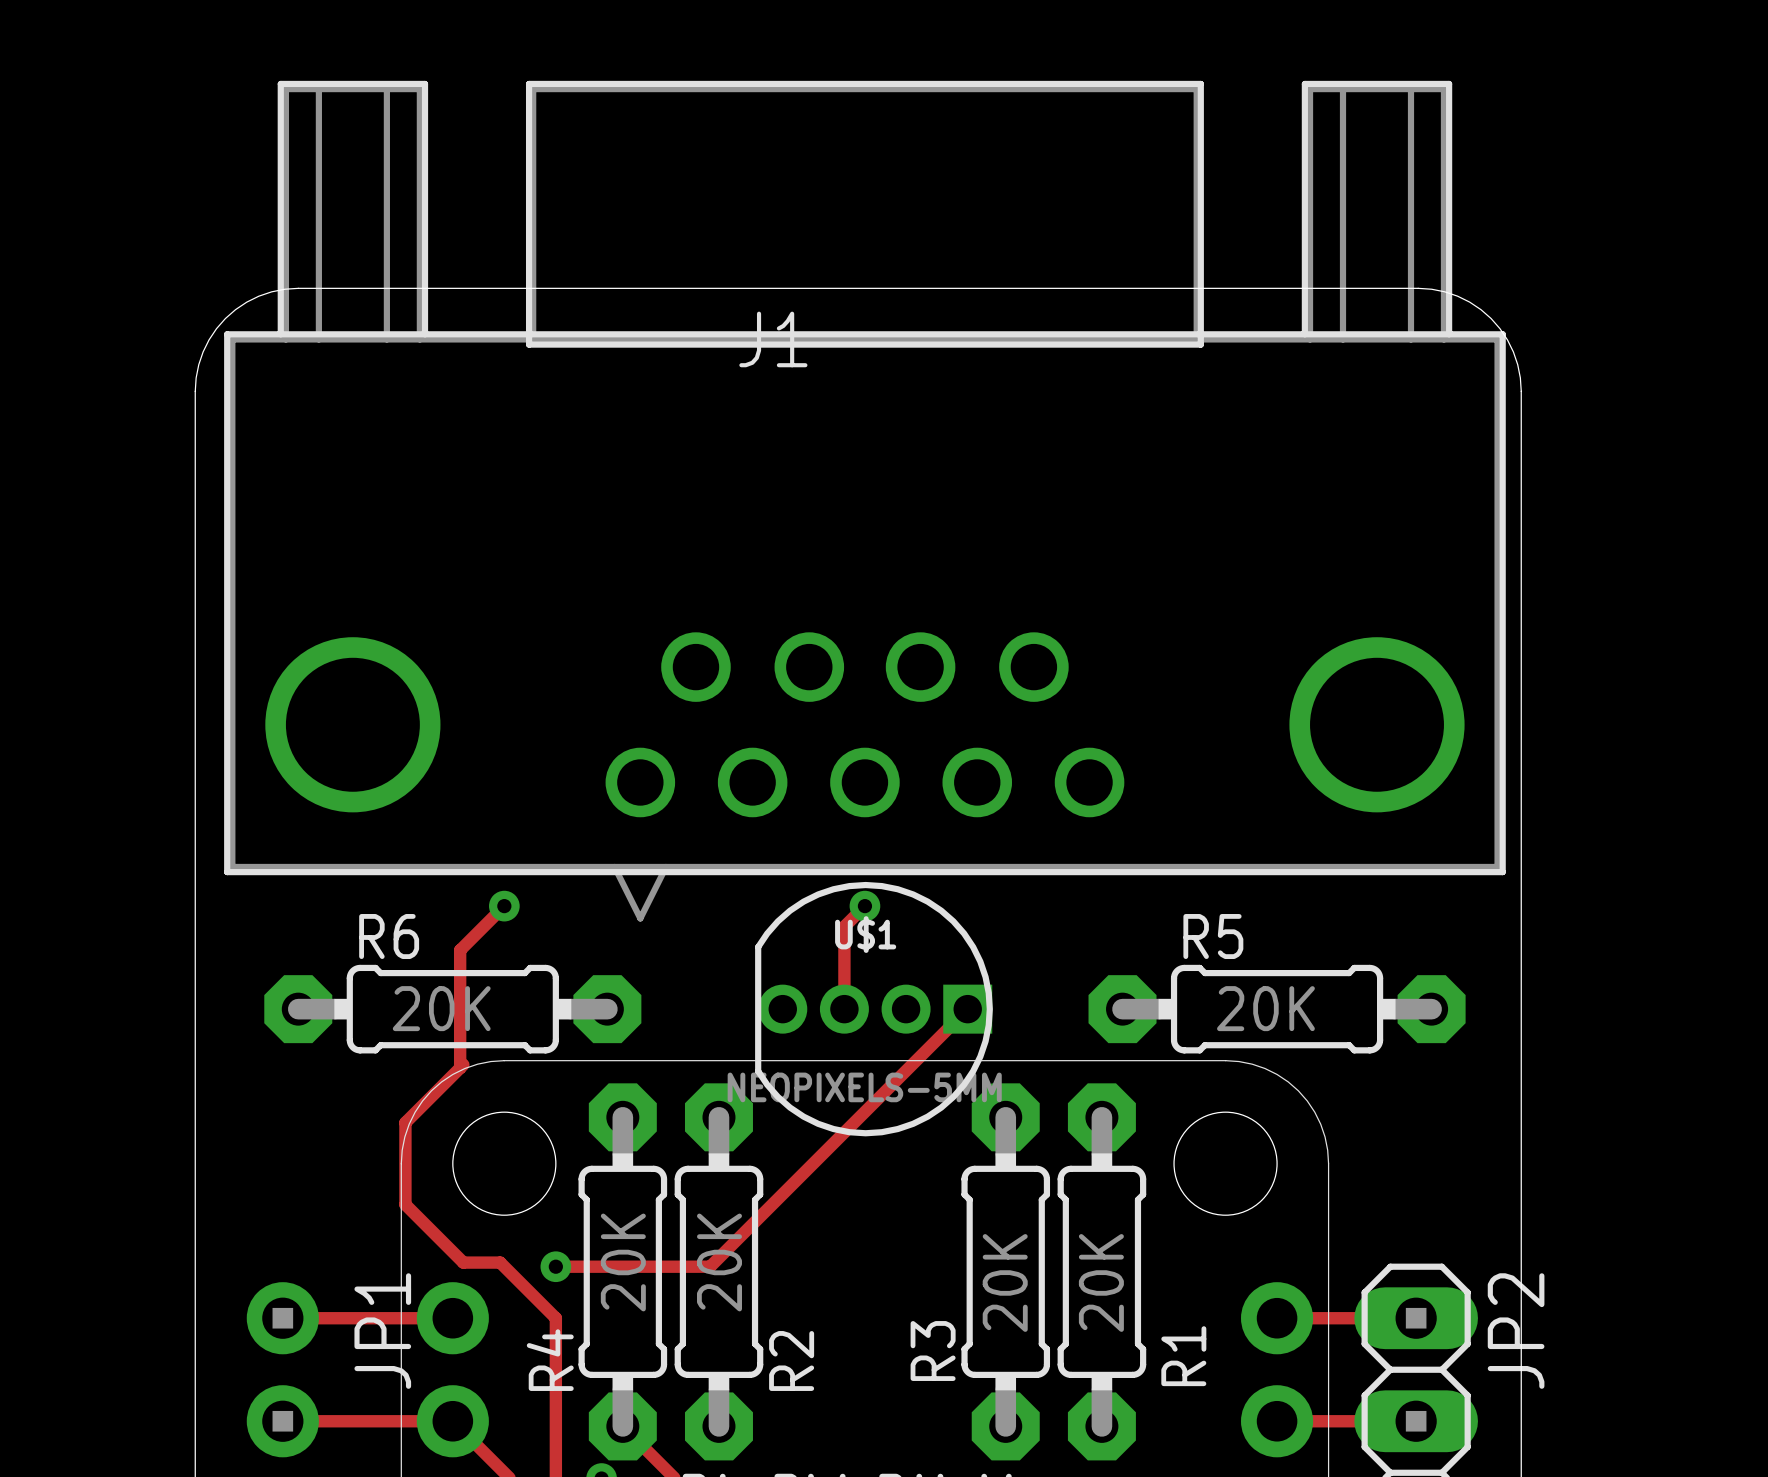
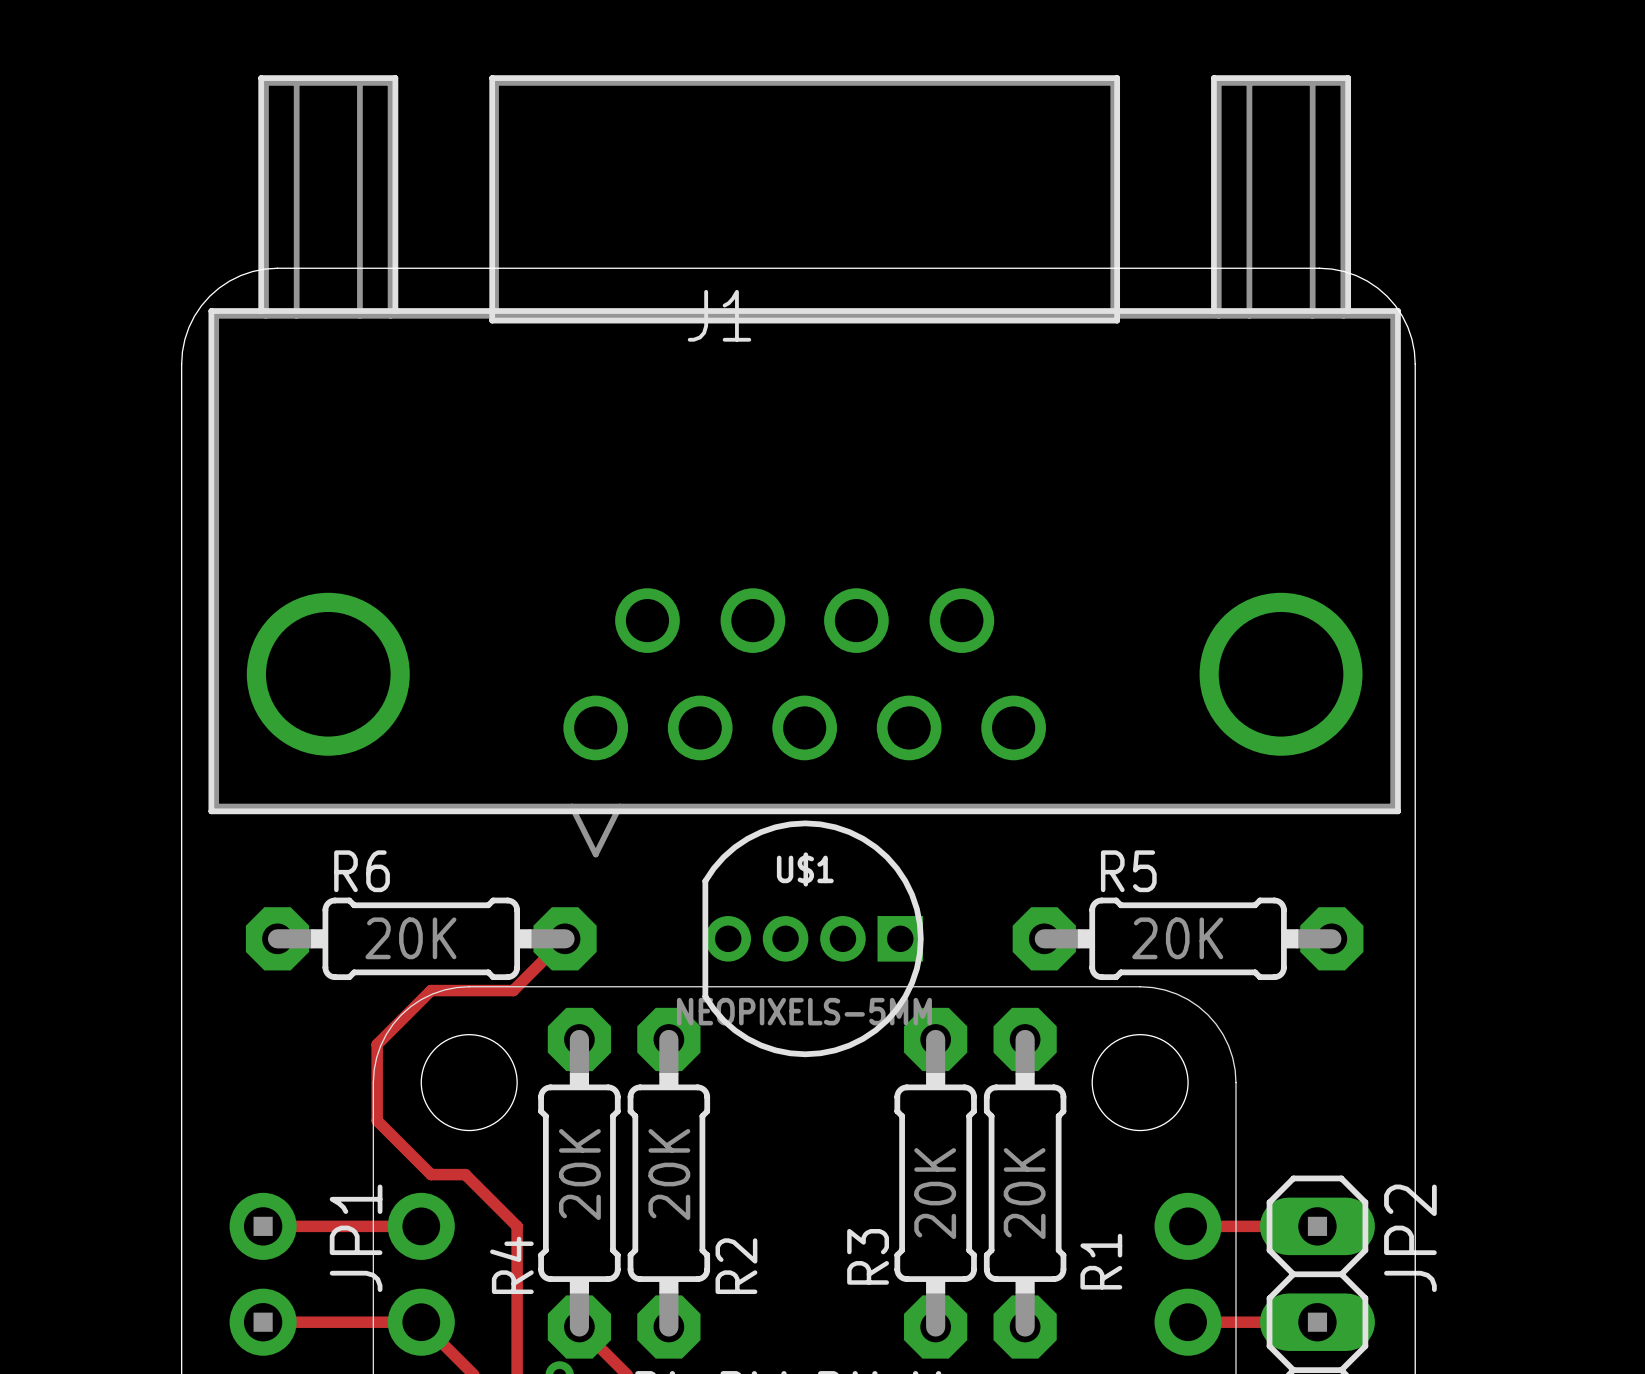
track: (504, 906) (460, 950) (460, 1067) -> none
via: (504, 906) -> none
track: (864, 906) (844, 926) (844, 1009) -> none
via: (864, 906) -> none
track: none -> (565, 938) (513, 990) (431, 990)
track: (967, 1009) (710, 1266) (555, 1266) -> none
via: (555, 1266) -> none

